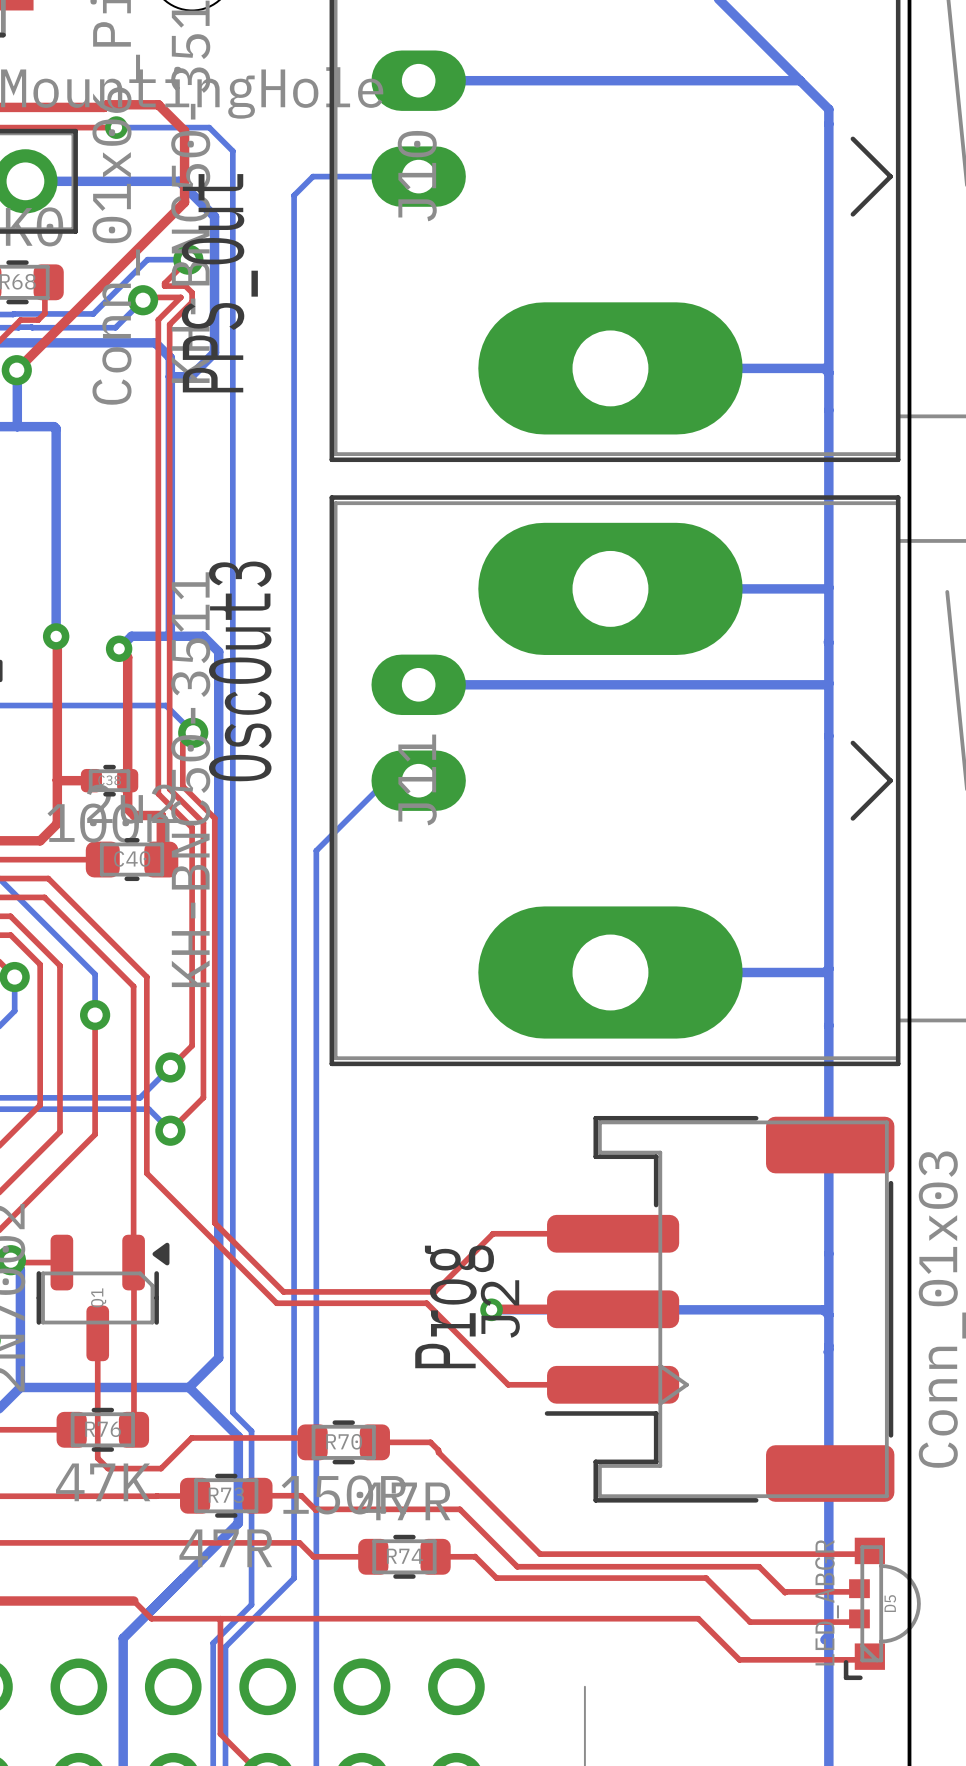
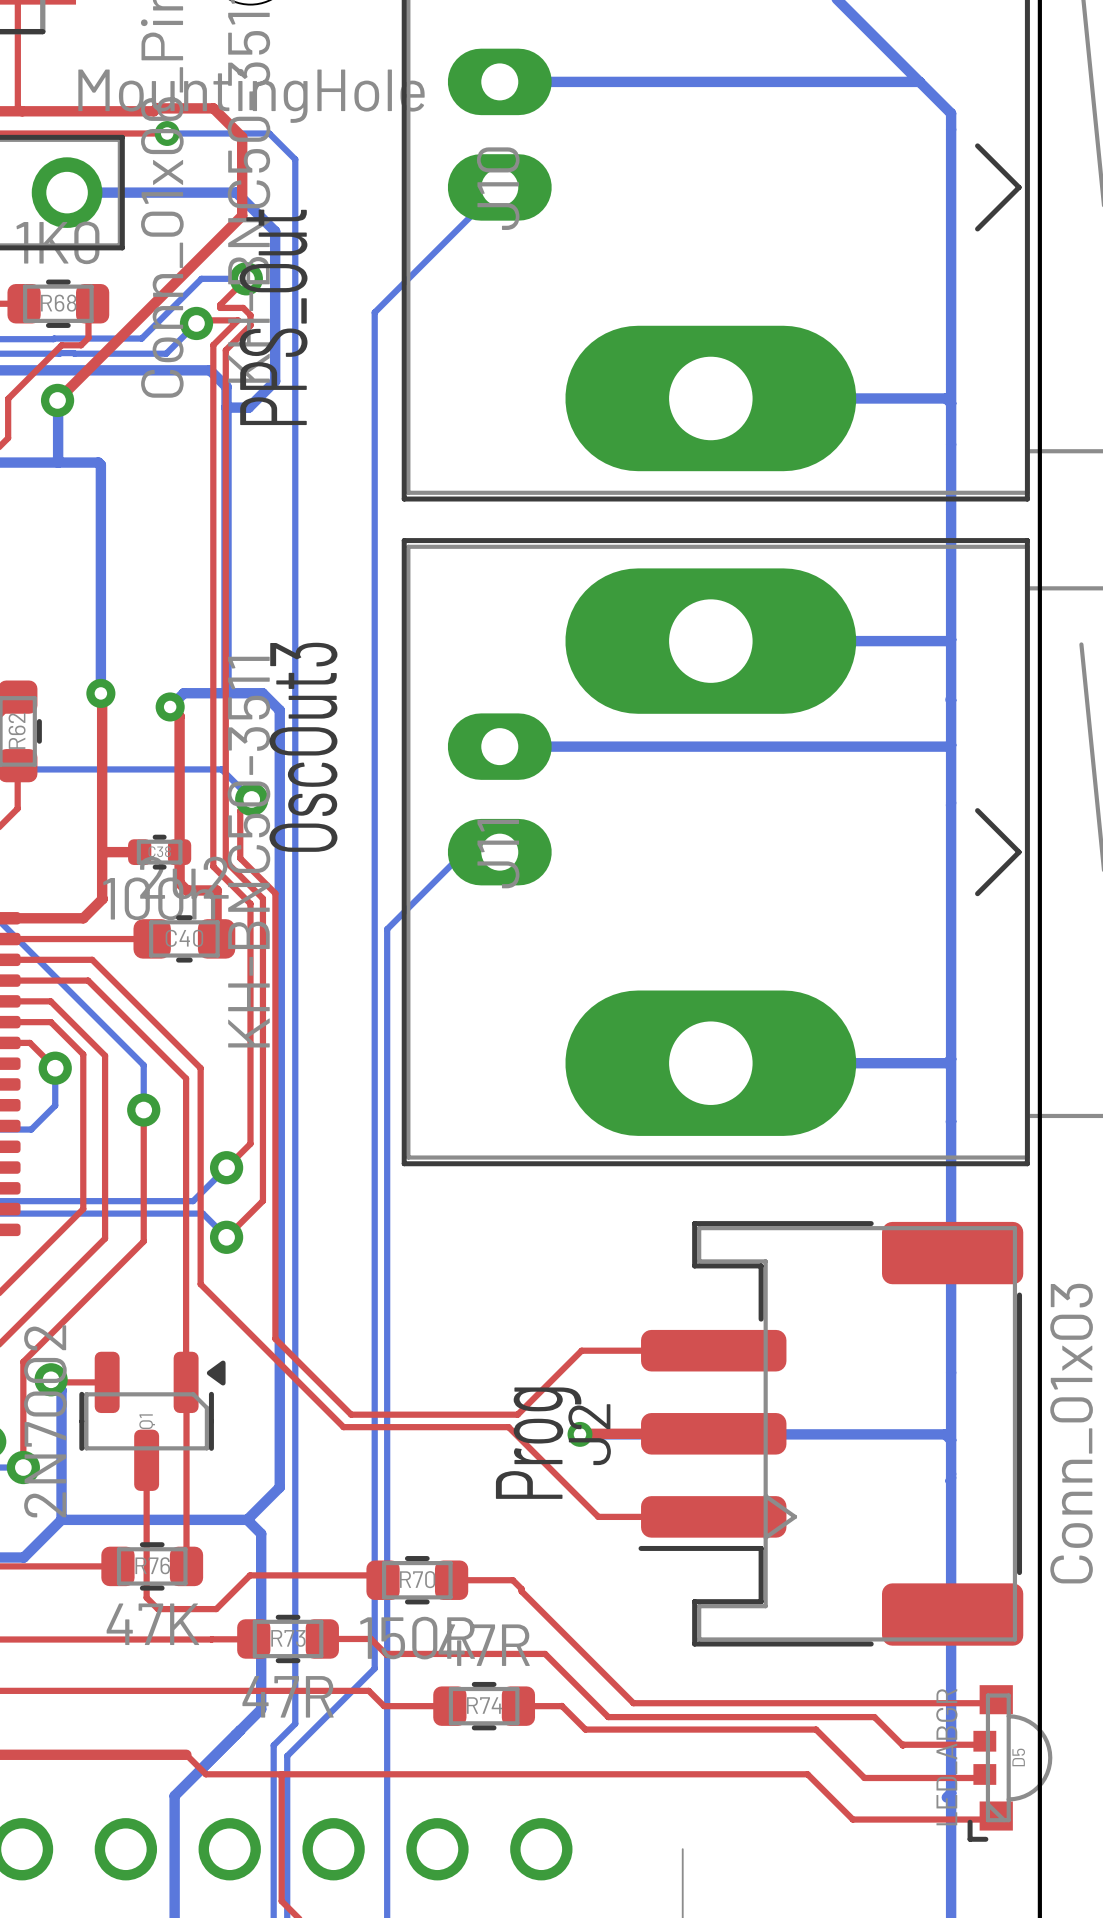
bottom track: (418, 176) (312, 176) (294, 195) (294, 1578) (225, 1646) -> (499, 187) (374, 312) (374, 1668) (287, 1756) (287, 1805)
bottom track: (201, 1400) (238, 1436) (238, 1523) (201, 1559) -> (261, 1533) (261, 1709)
bottom track: (232, 1412) (251, 1431) (251, 1604) (213, 1643) -> (295, 1547) (295, 1723) (273, 1745) (273, 1801)

